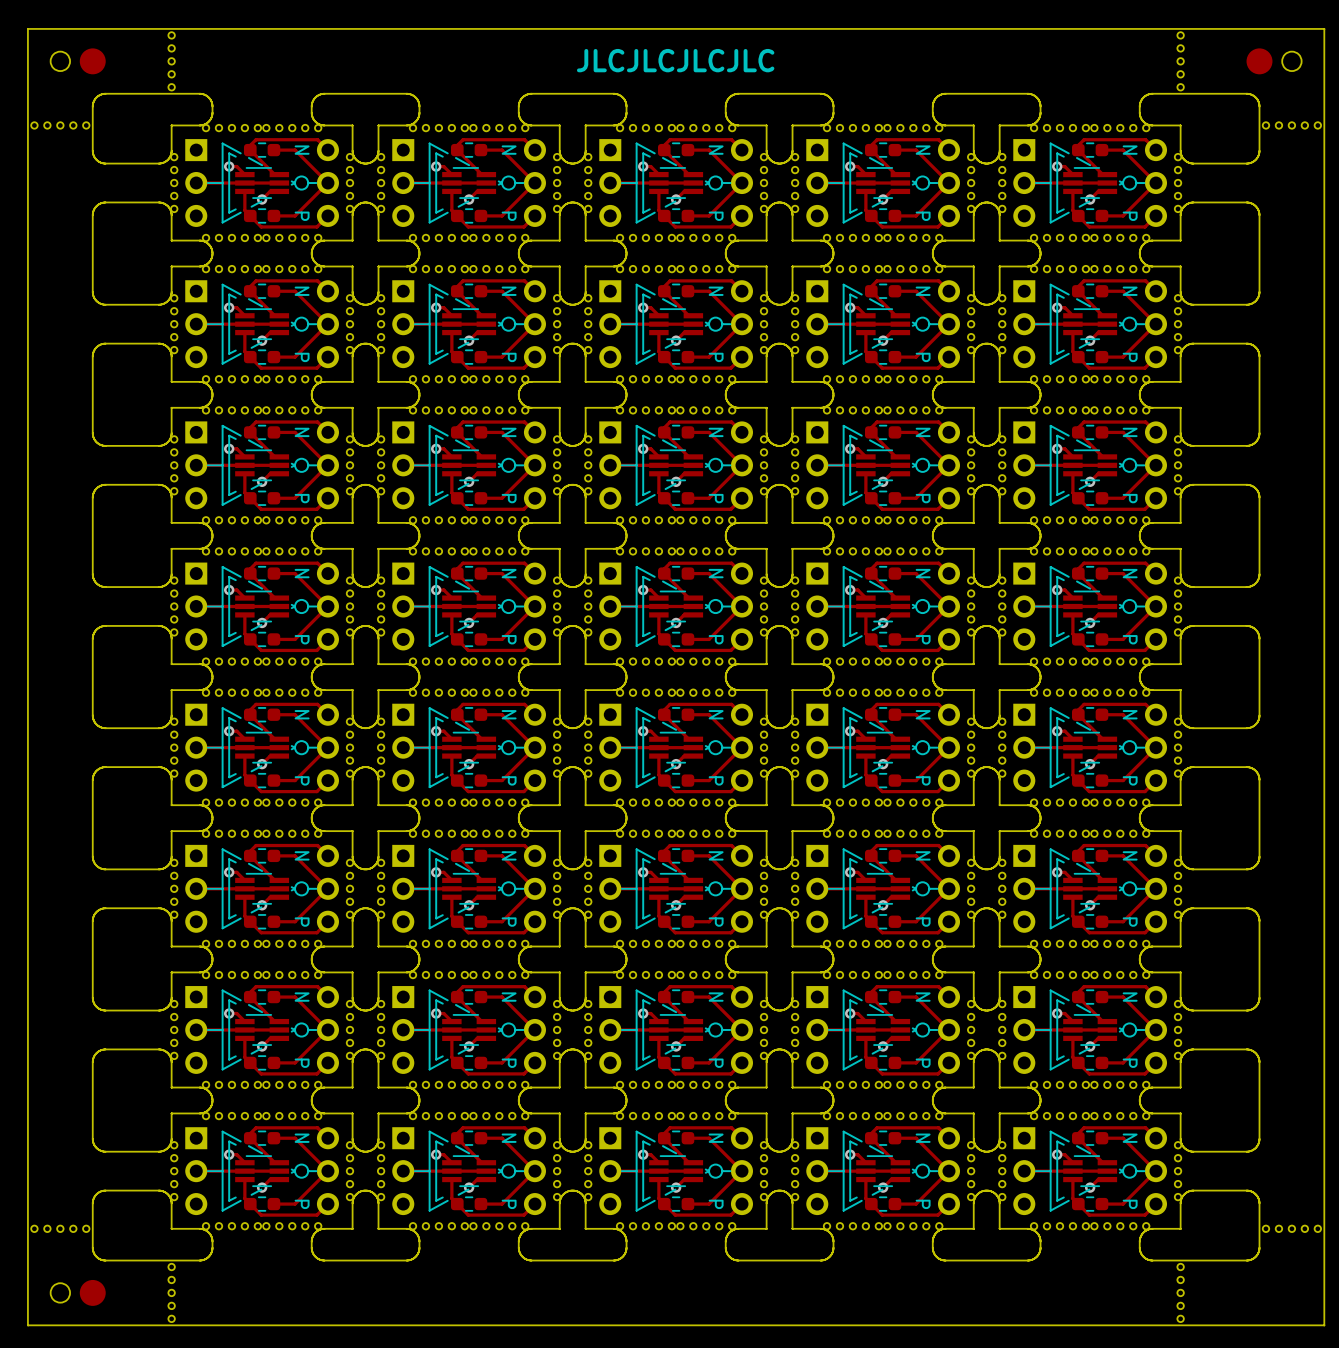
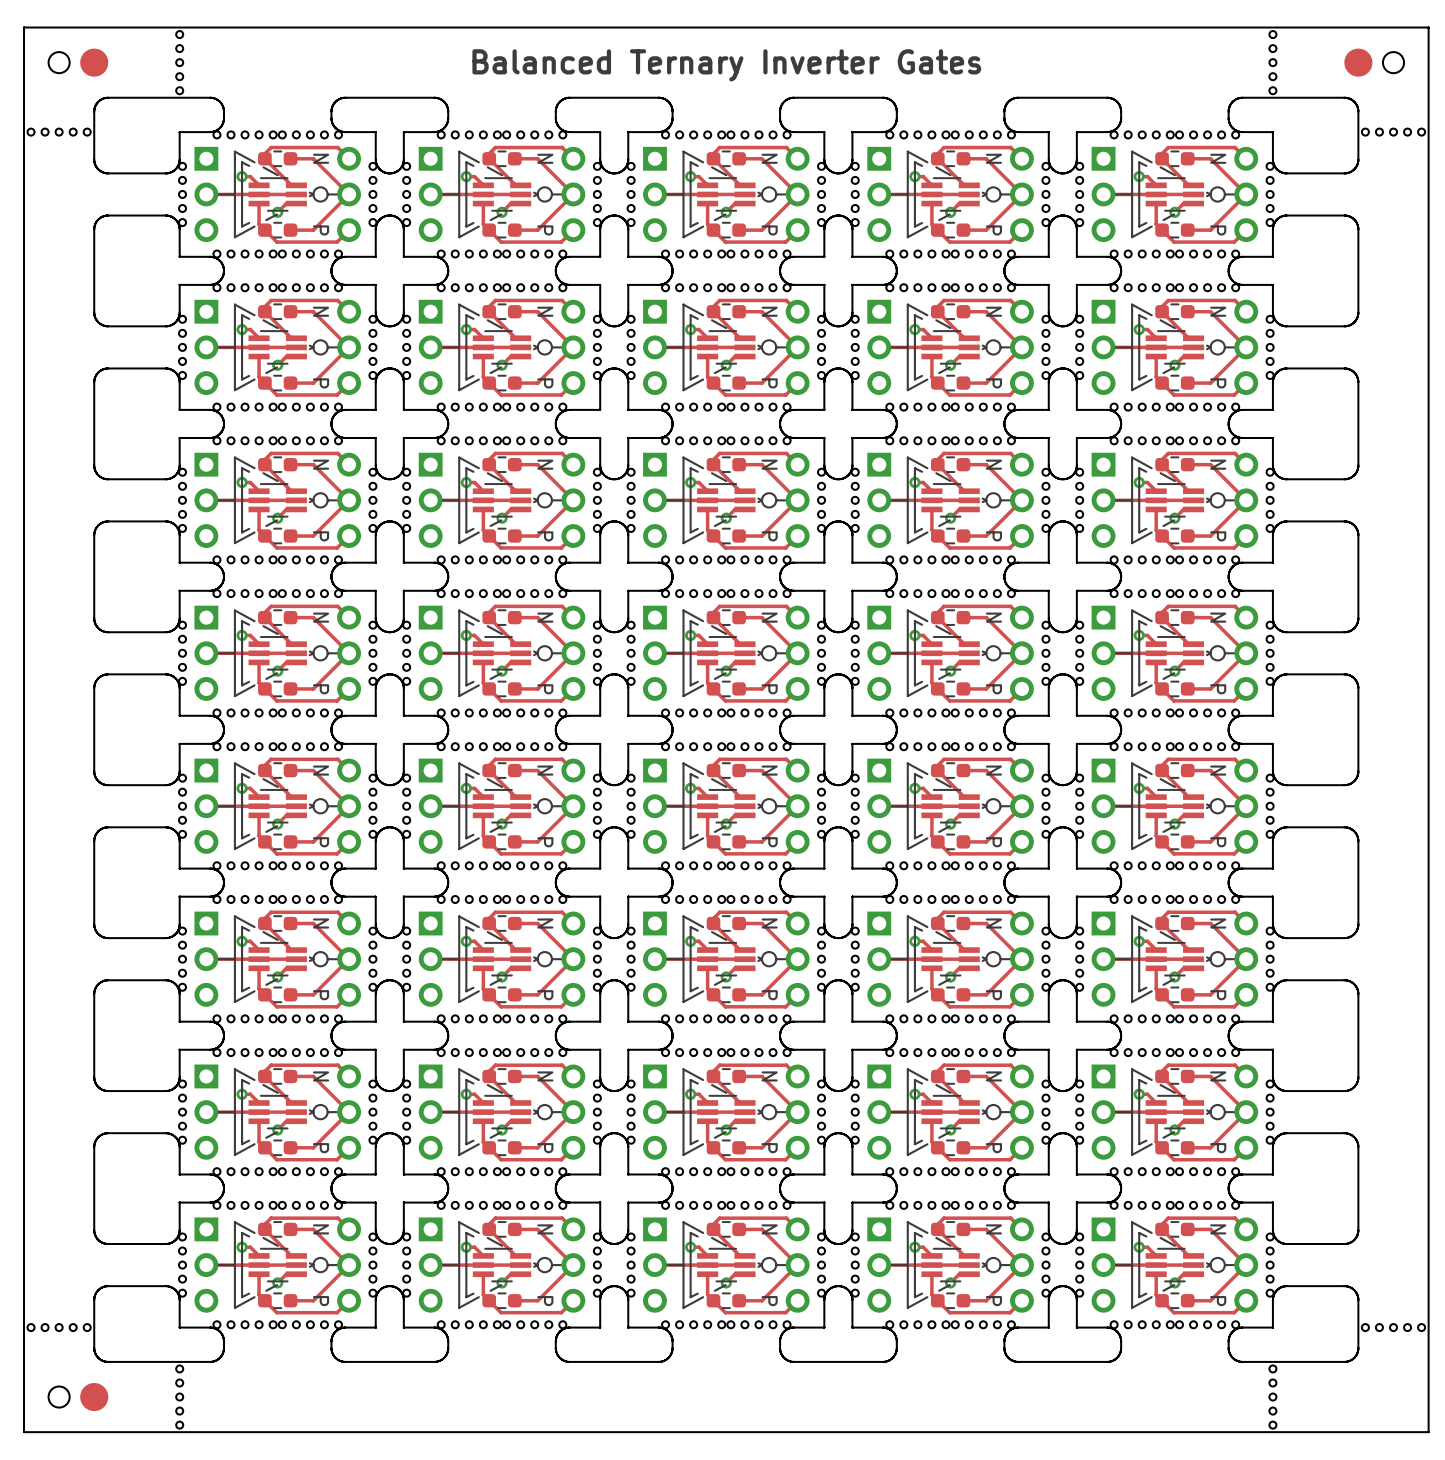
text: JLCJLCJLCJLC (675, 60) -> Balanced Ternary Inverter Gates (726, 65)

